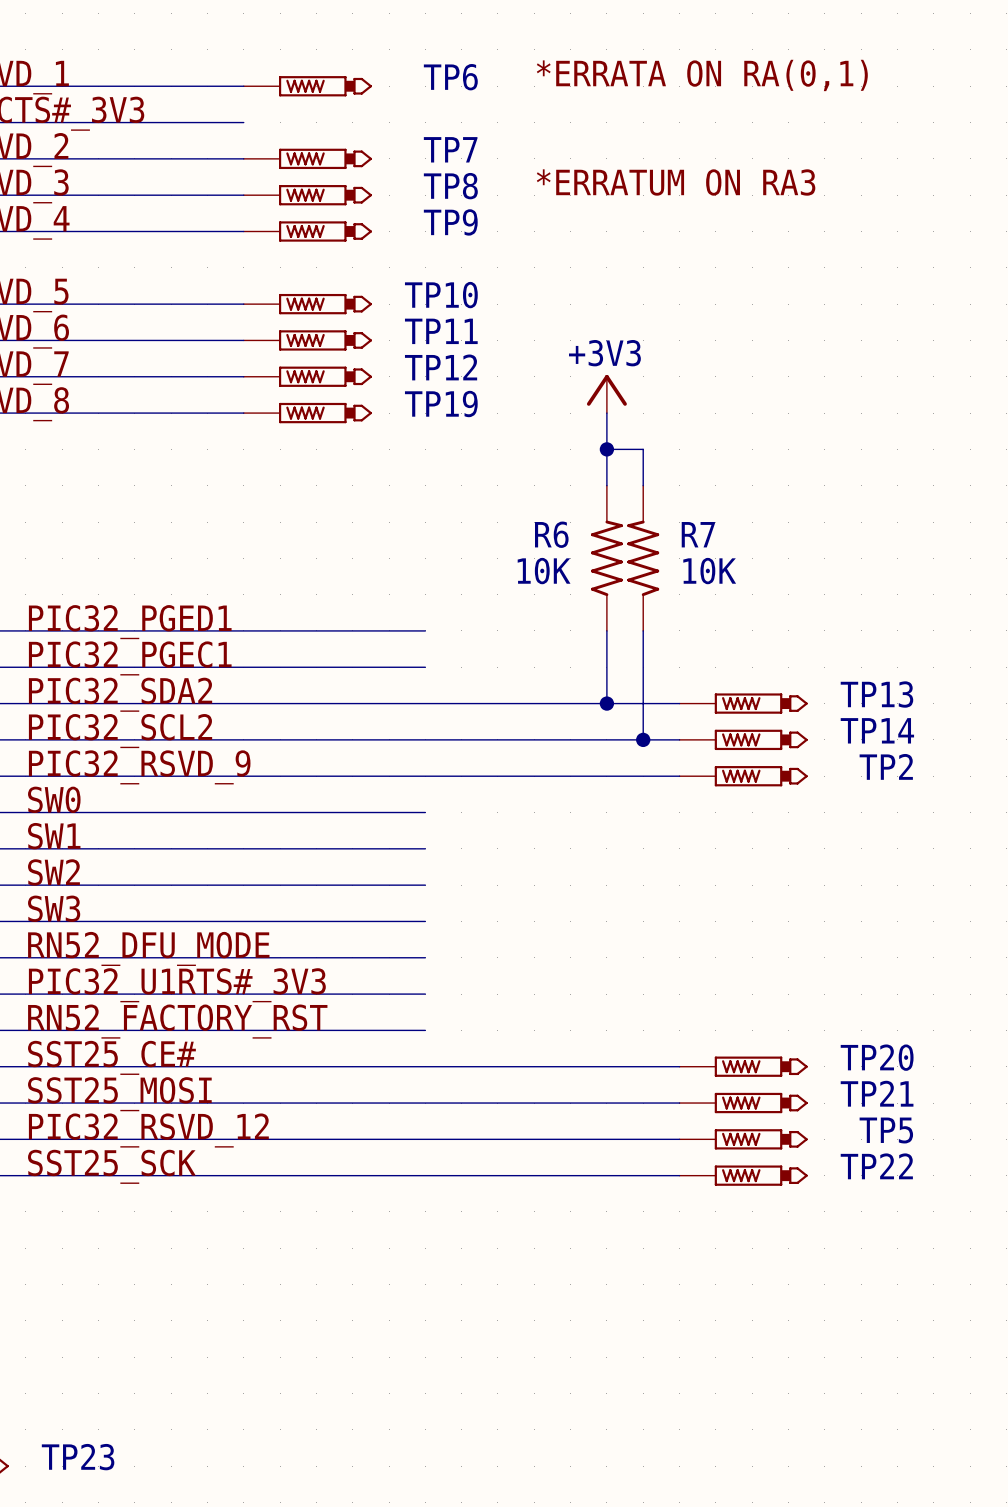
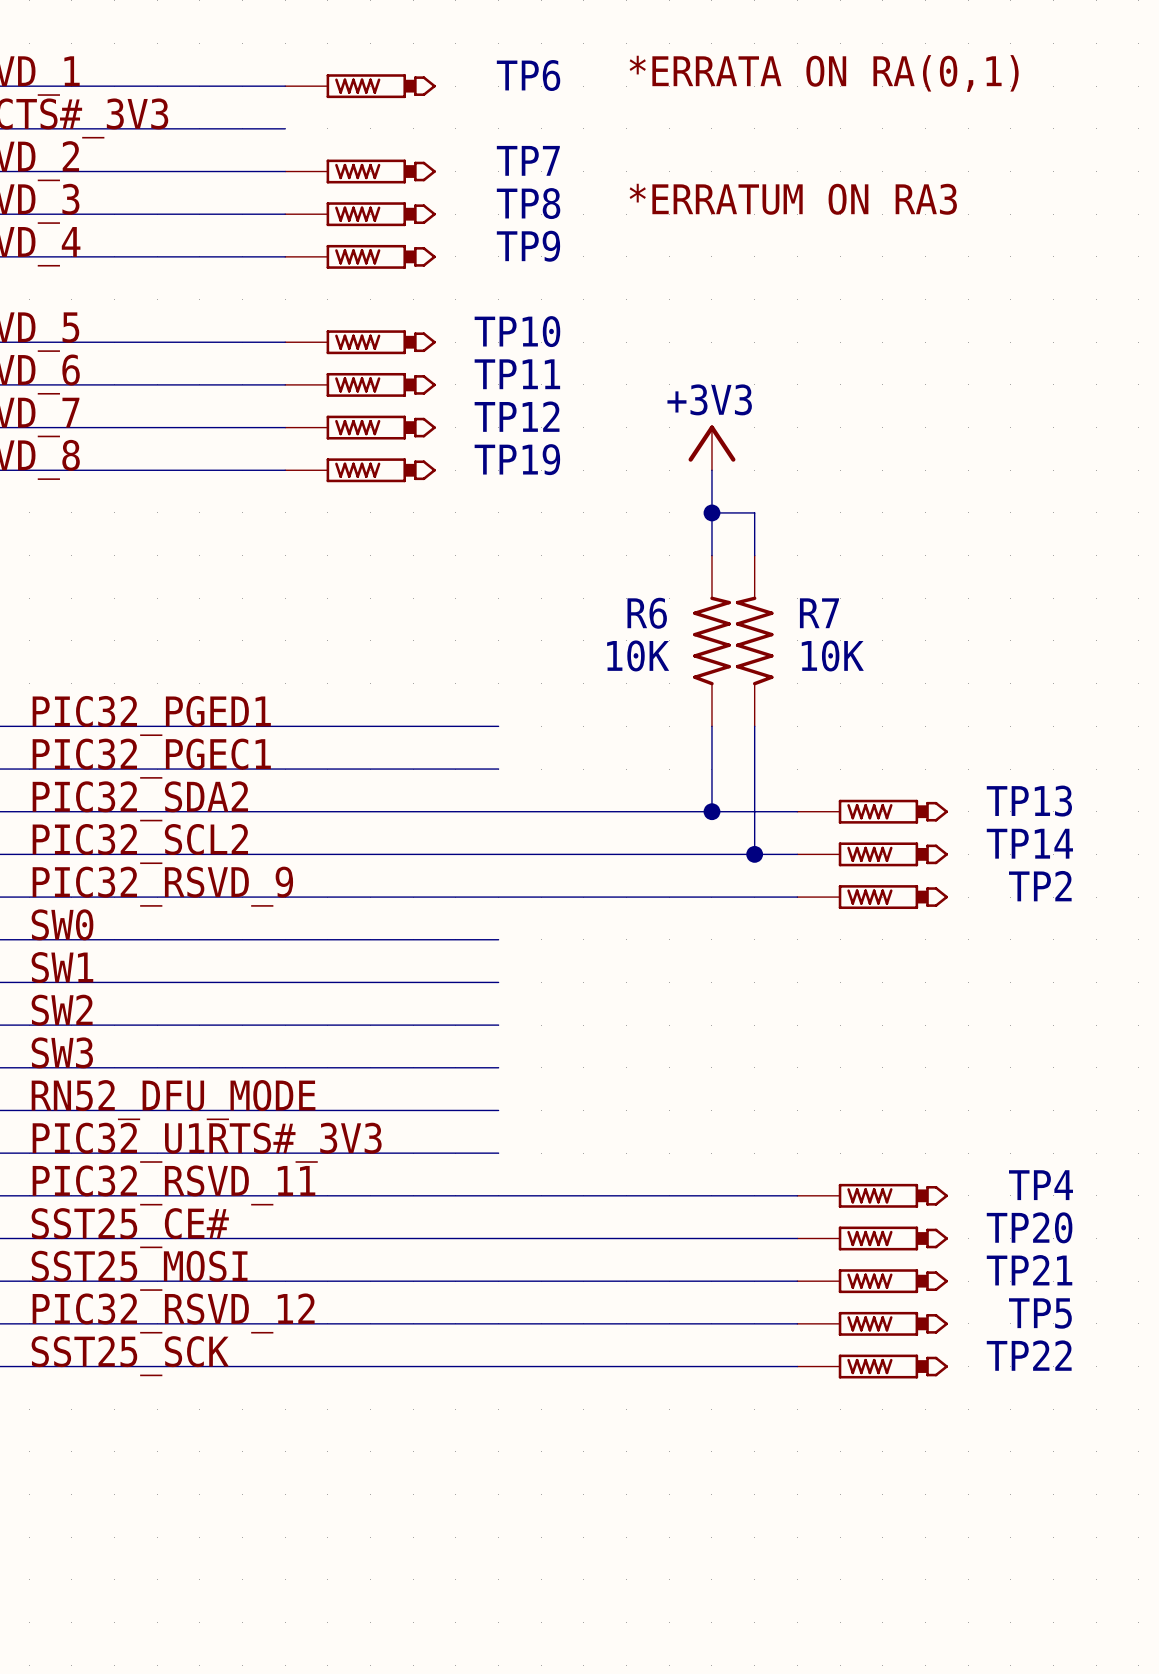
label: RN52_FACTORY_RST (177, 1021) -> PIC32_RSVD_11 (173, 1185)
wire: none -> (498, 1195) (797, 1195)
TP4: none -> (872, 1195)

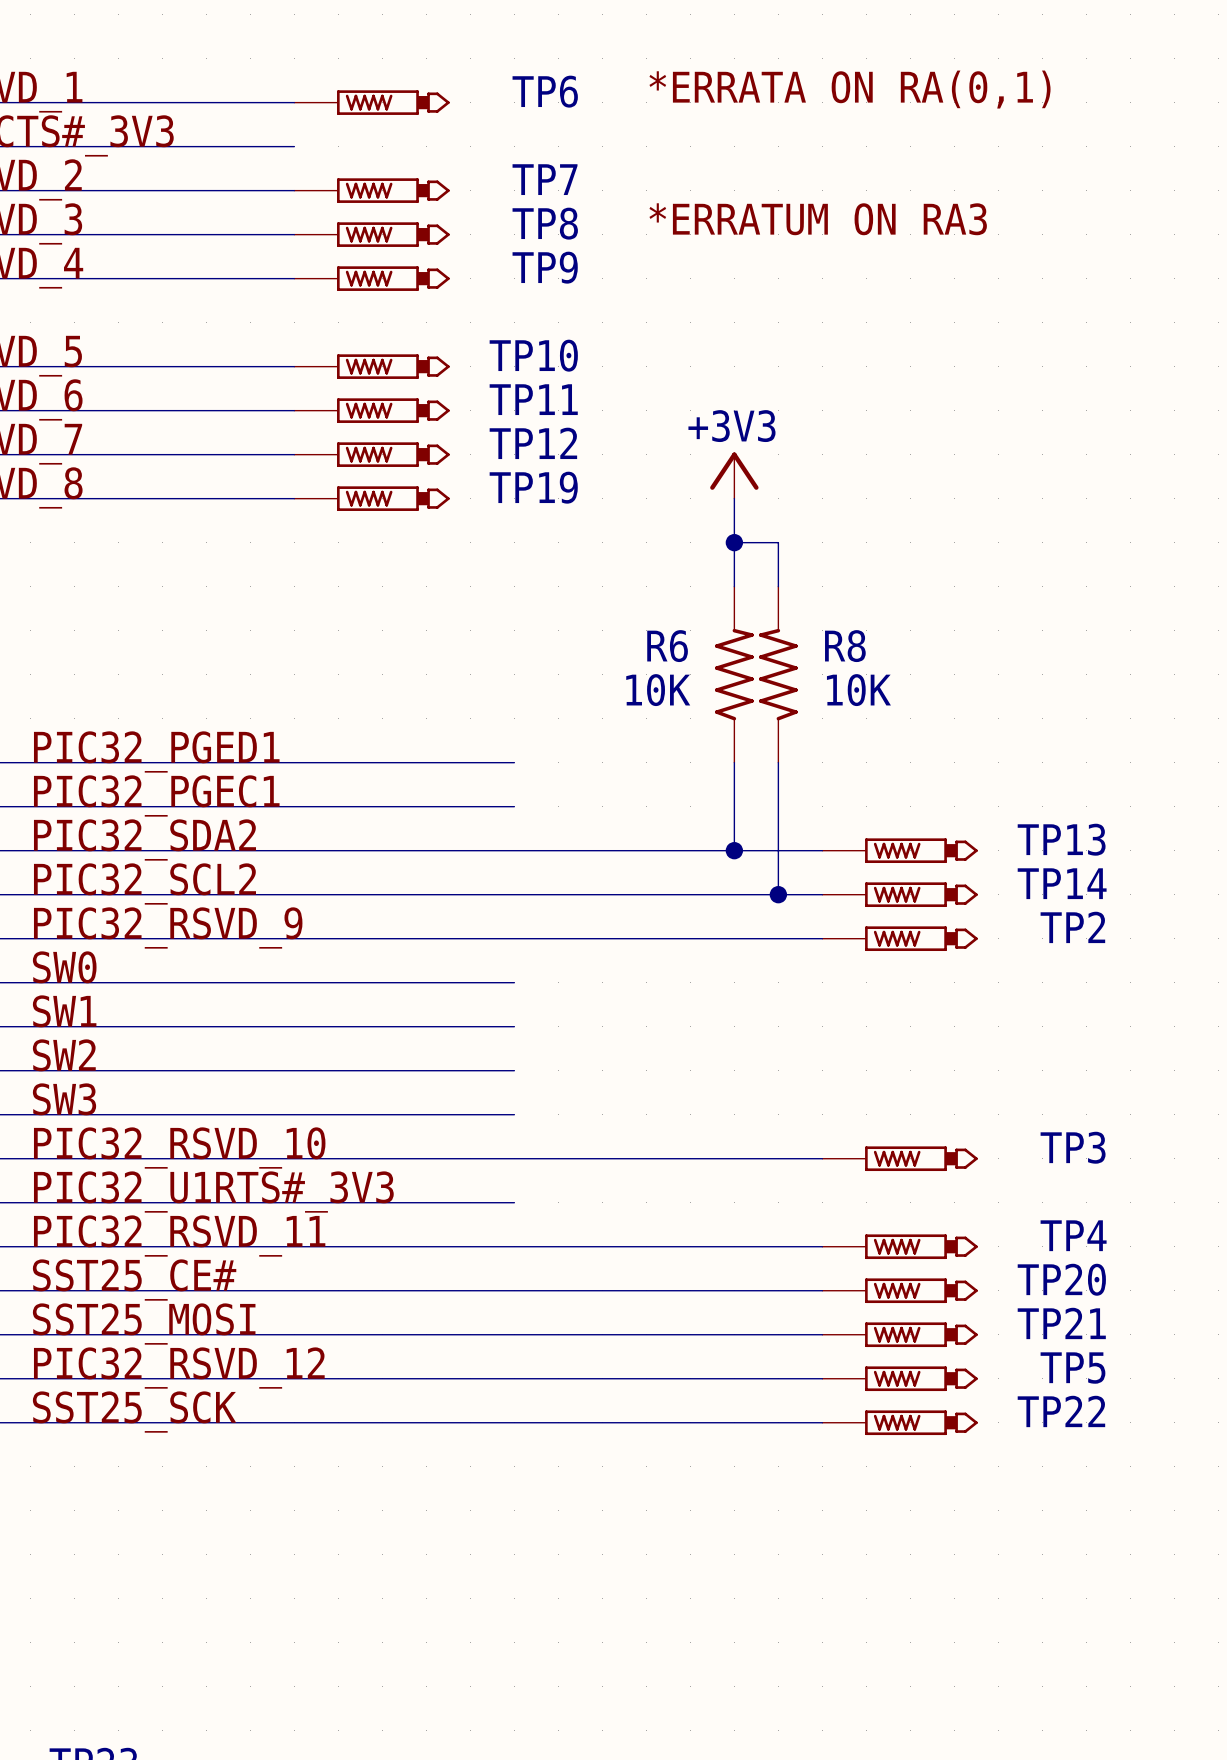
R7 name: R7 (819, 613) -> R8 (845, 646)
label: RN52_DFU_MODE (173, 1100) -> PIC32_RSVD_10 (179, 1148)
wire: none -> (514, 1158) (822, 1158)
TP3: none -> (900, 1158)

